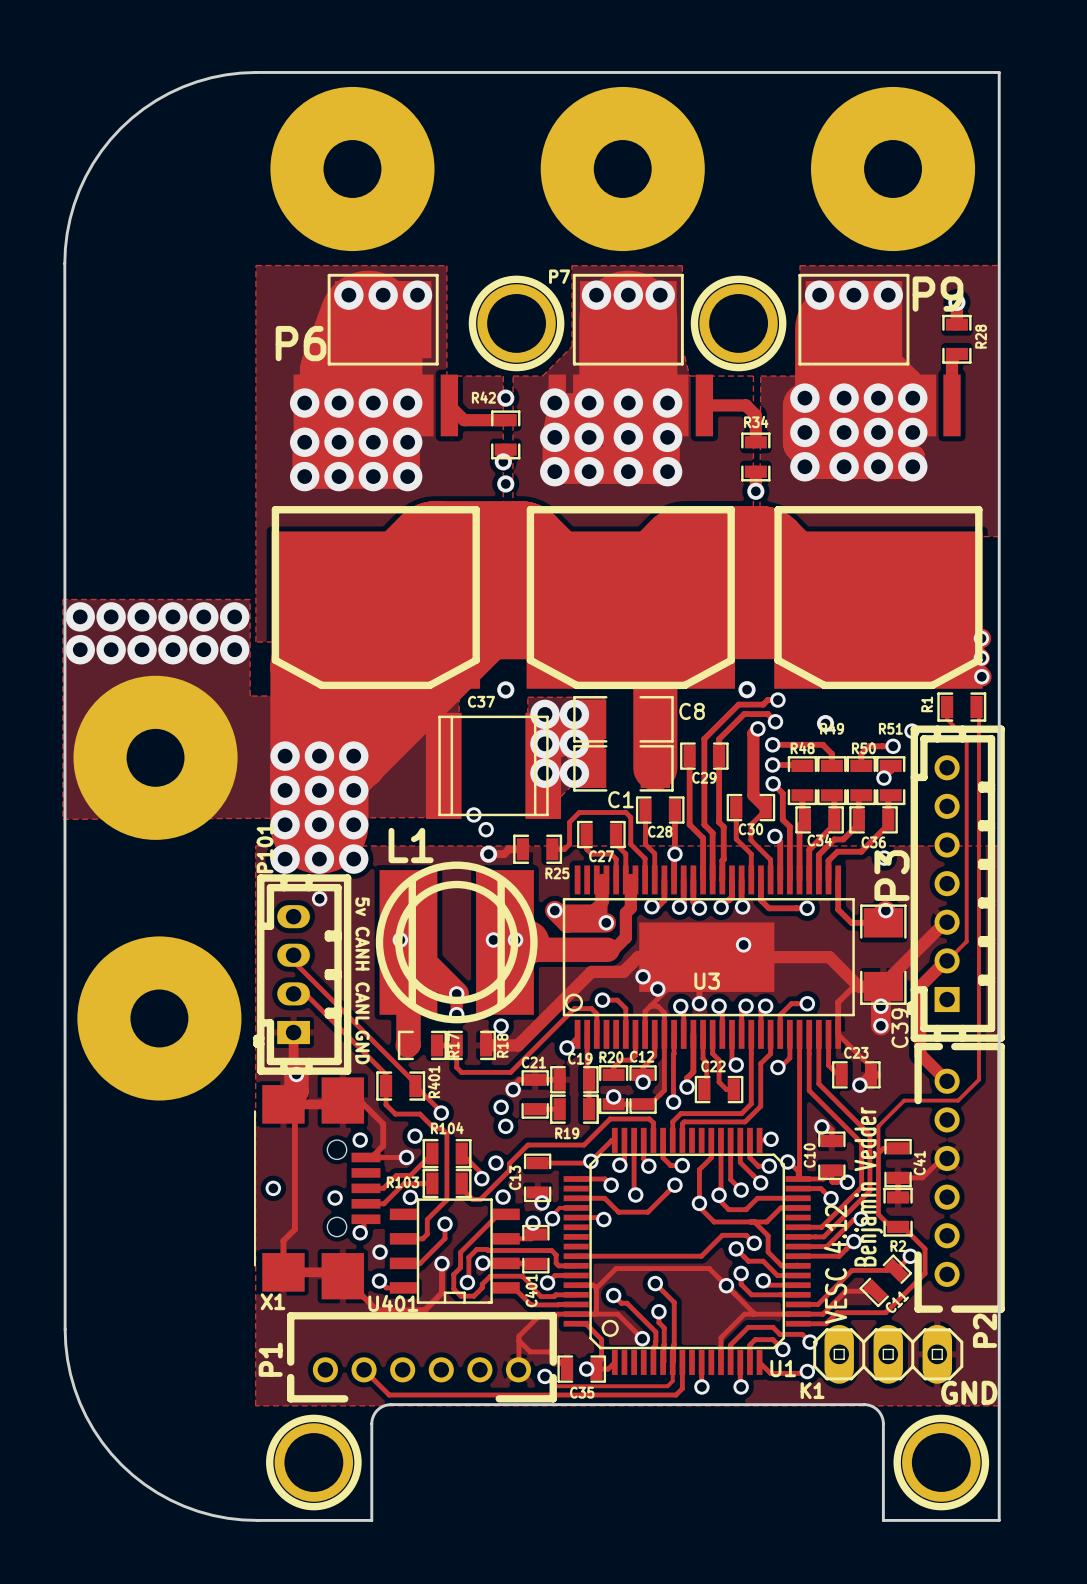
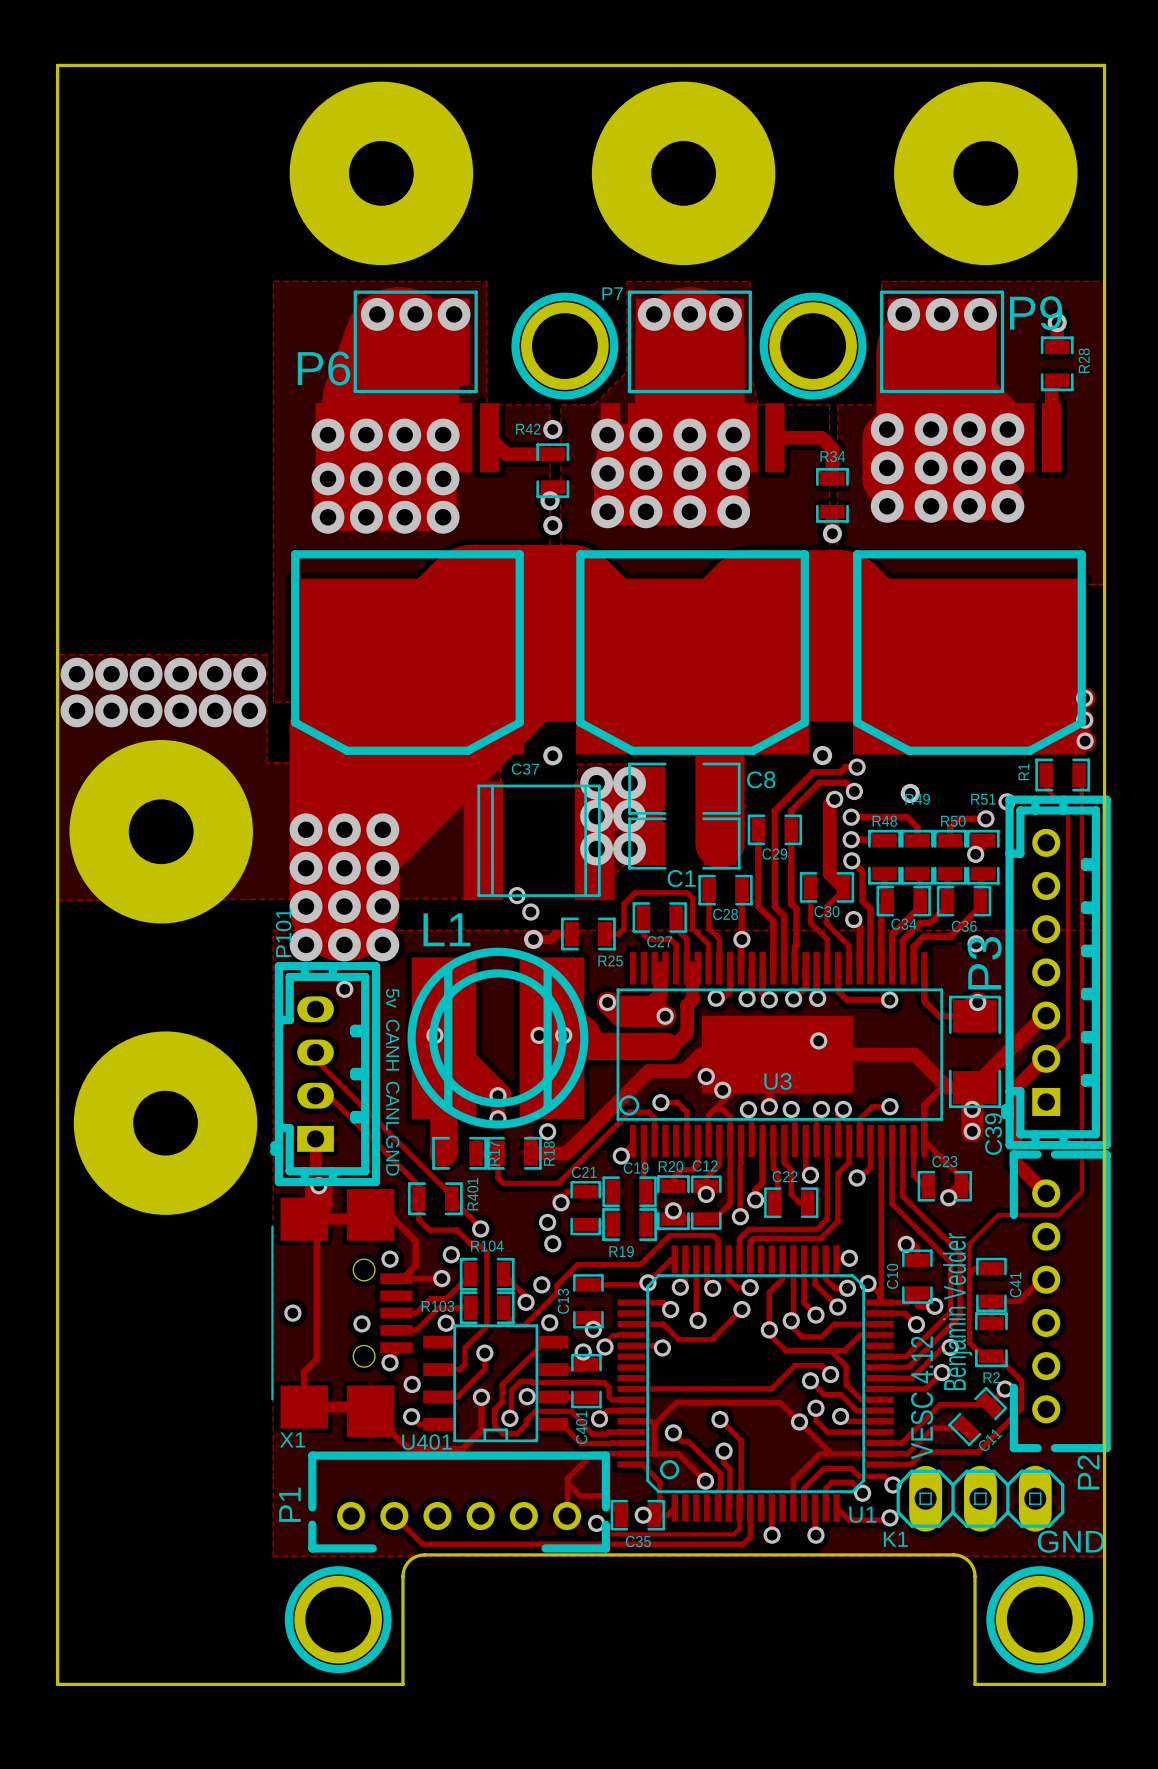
board edge: (255, 72) (211, 77) (182, 87) (156, 100) (131, 118) (110, 139) (92, 163) (79, 190) (67, 233) (64, 263) (65, 1329) (70, 1374) (79, 1402) (102, 1442) (121, 1465) (144, 1484) (184, 1506) (212, 1515) (257, 1520) -> (273, 65) (57, 65) (57, 1684) (275, 1684)

